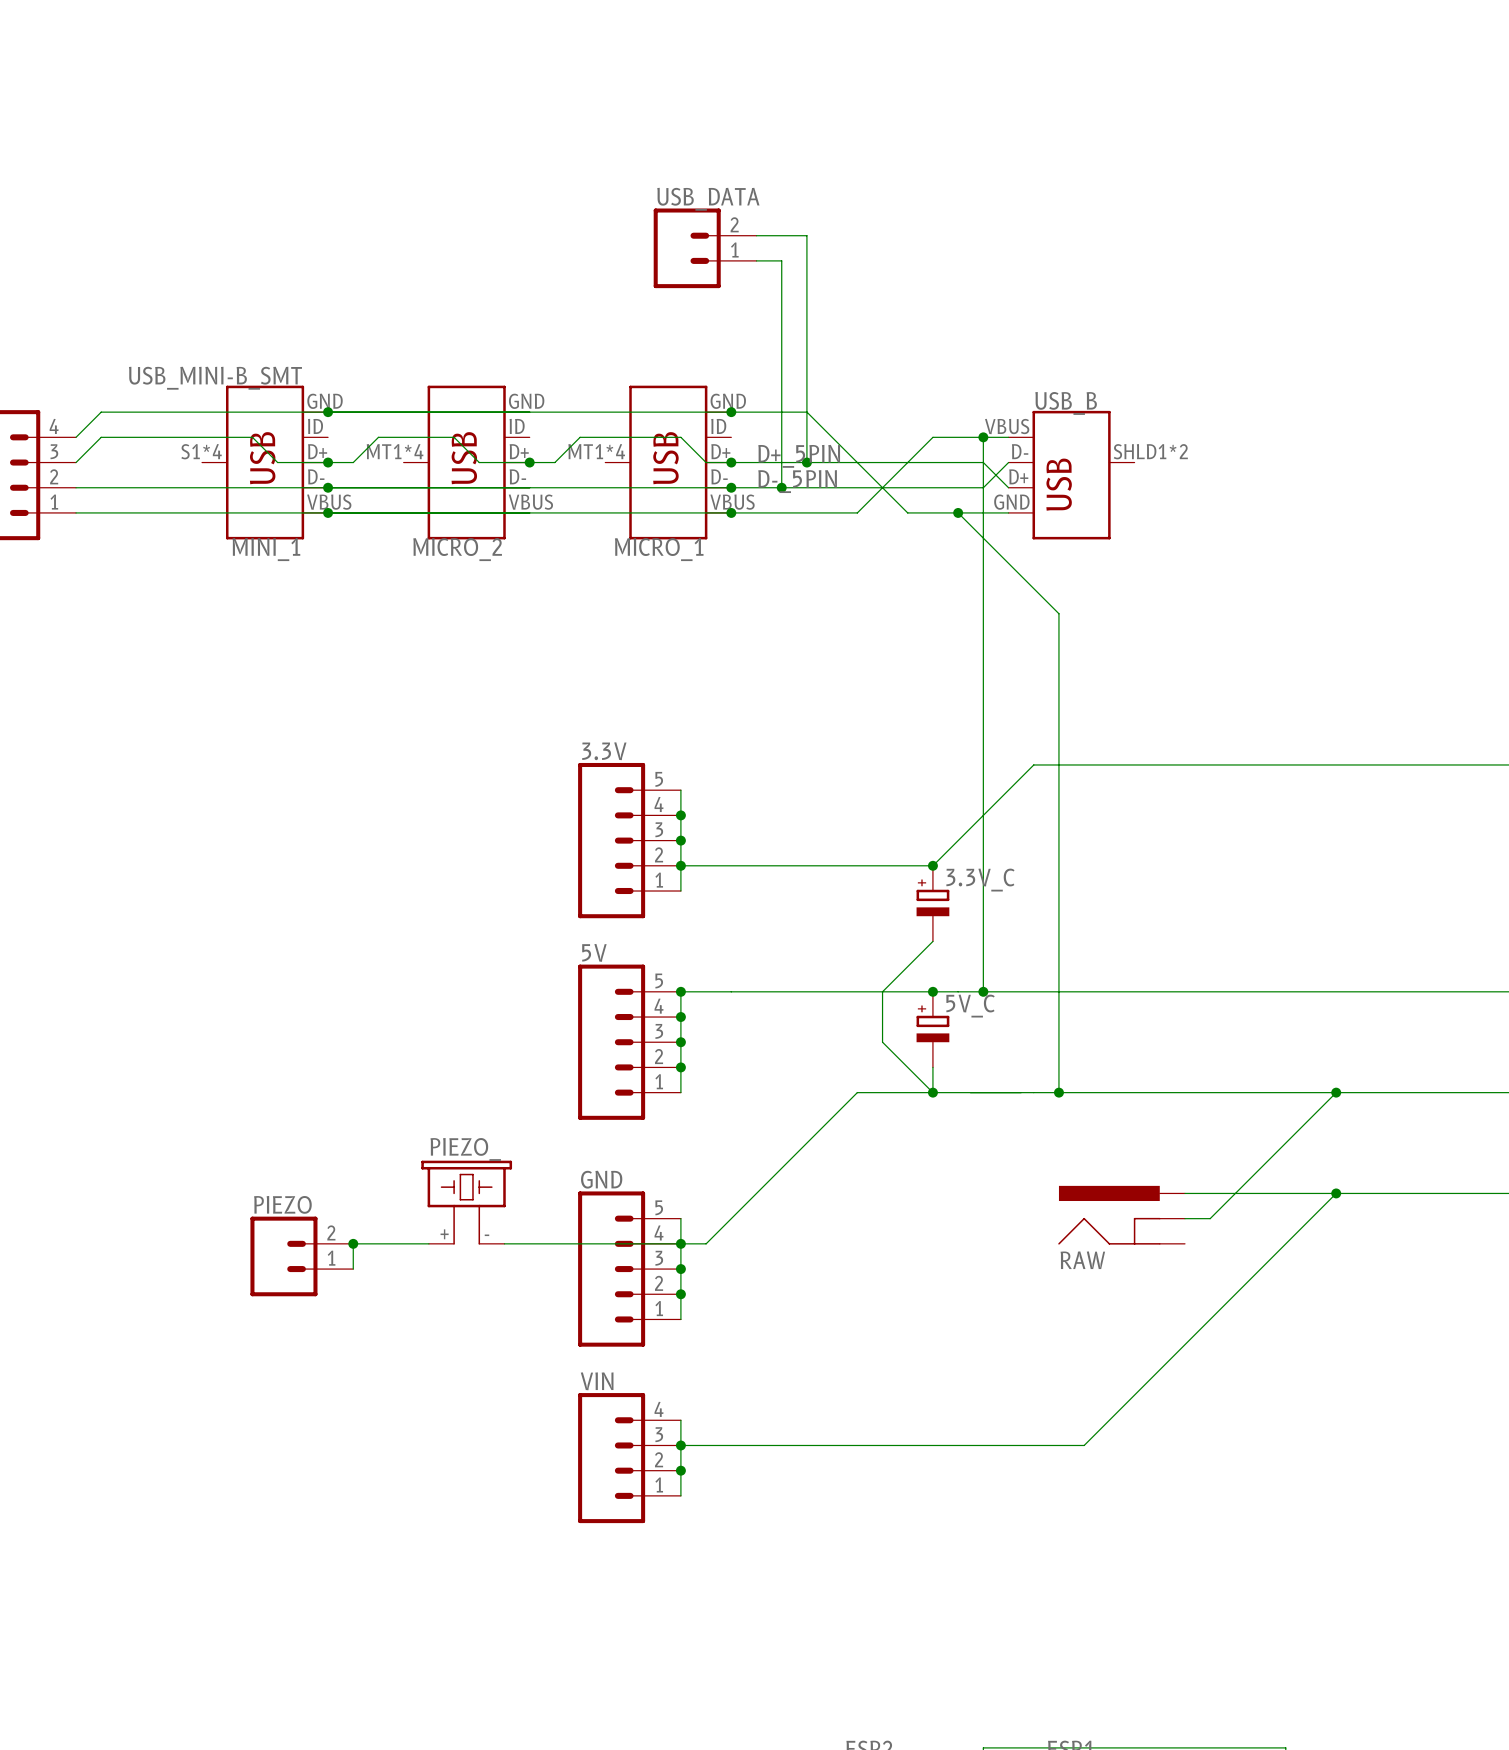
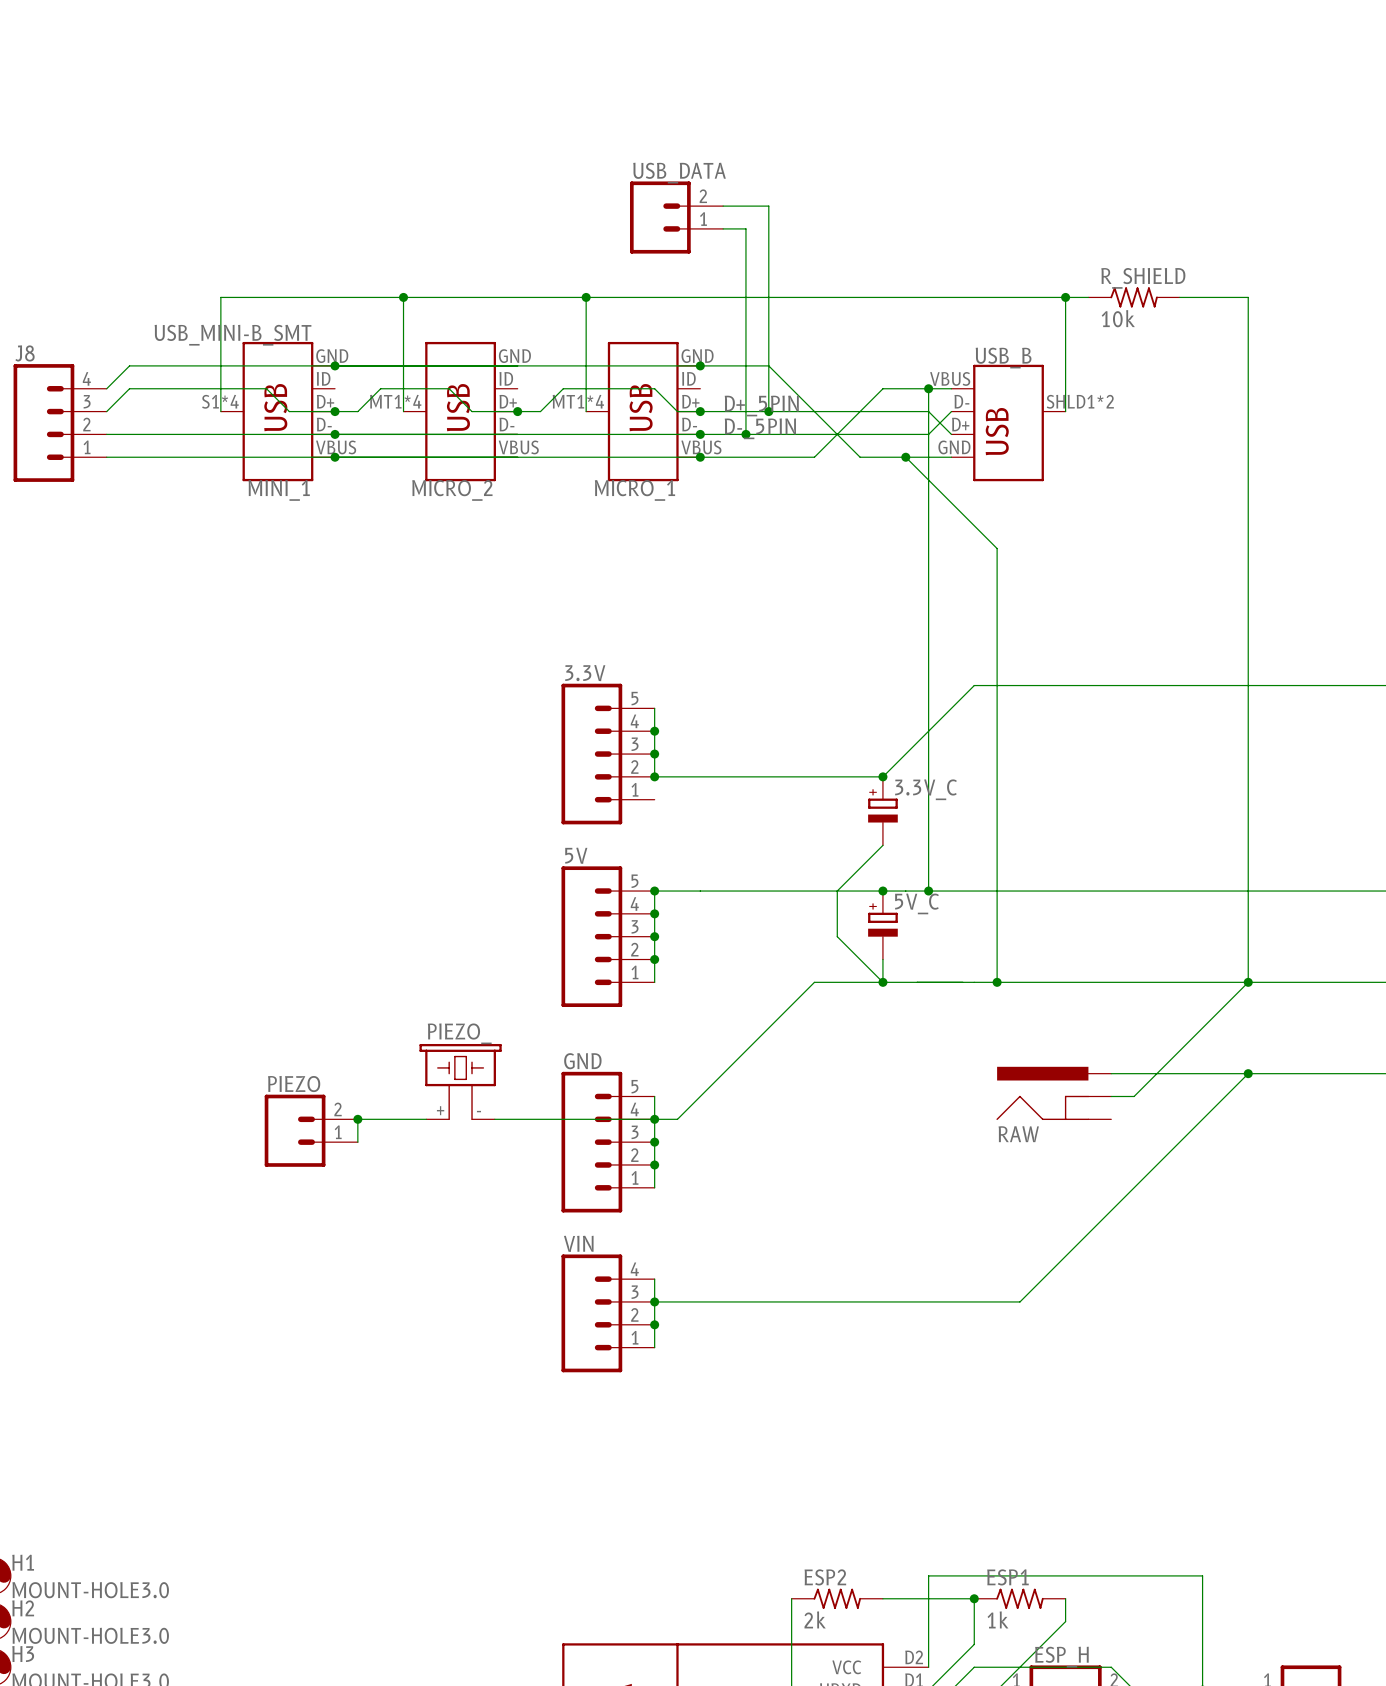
wire: none -> (403, 297) (403, 411)
junction: none -> (403, 297)
wire: none -> (586, 297) (586, 411)
junction: none -> (586, 297)
wire: none -> (1065, 297) (1065, 411)
junction: none -> (1065, 297)
wire: none -> (1088, 297) (220, 297) (220, 411)
R_SHIELD: none -> 10k (1134, 297)
wire: none -> (1179, 297) (1248, 297) (1248, 982)
wire: (680, 865) (680, 891) -> none

